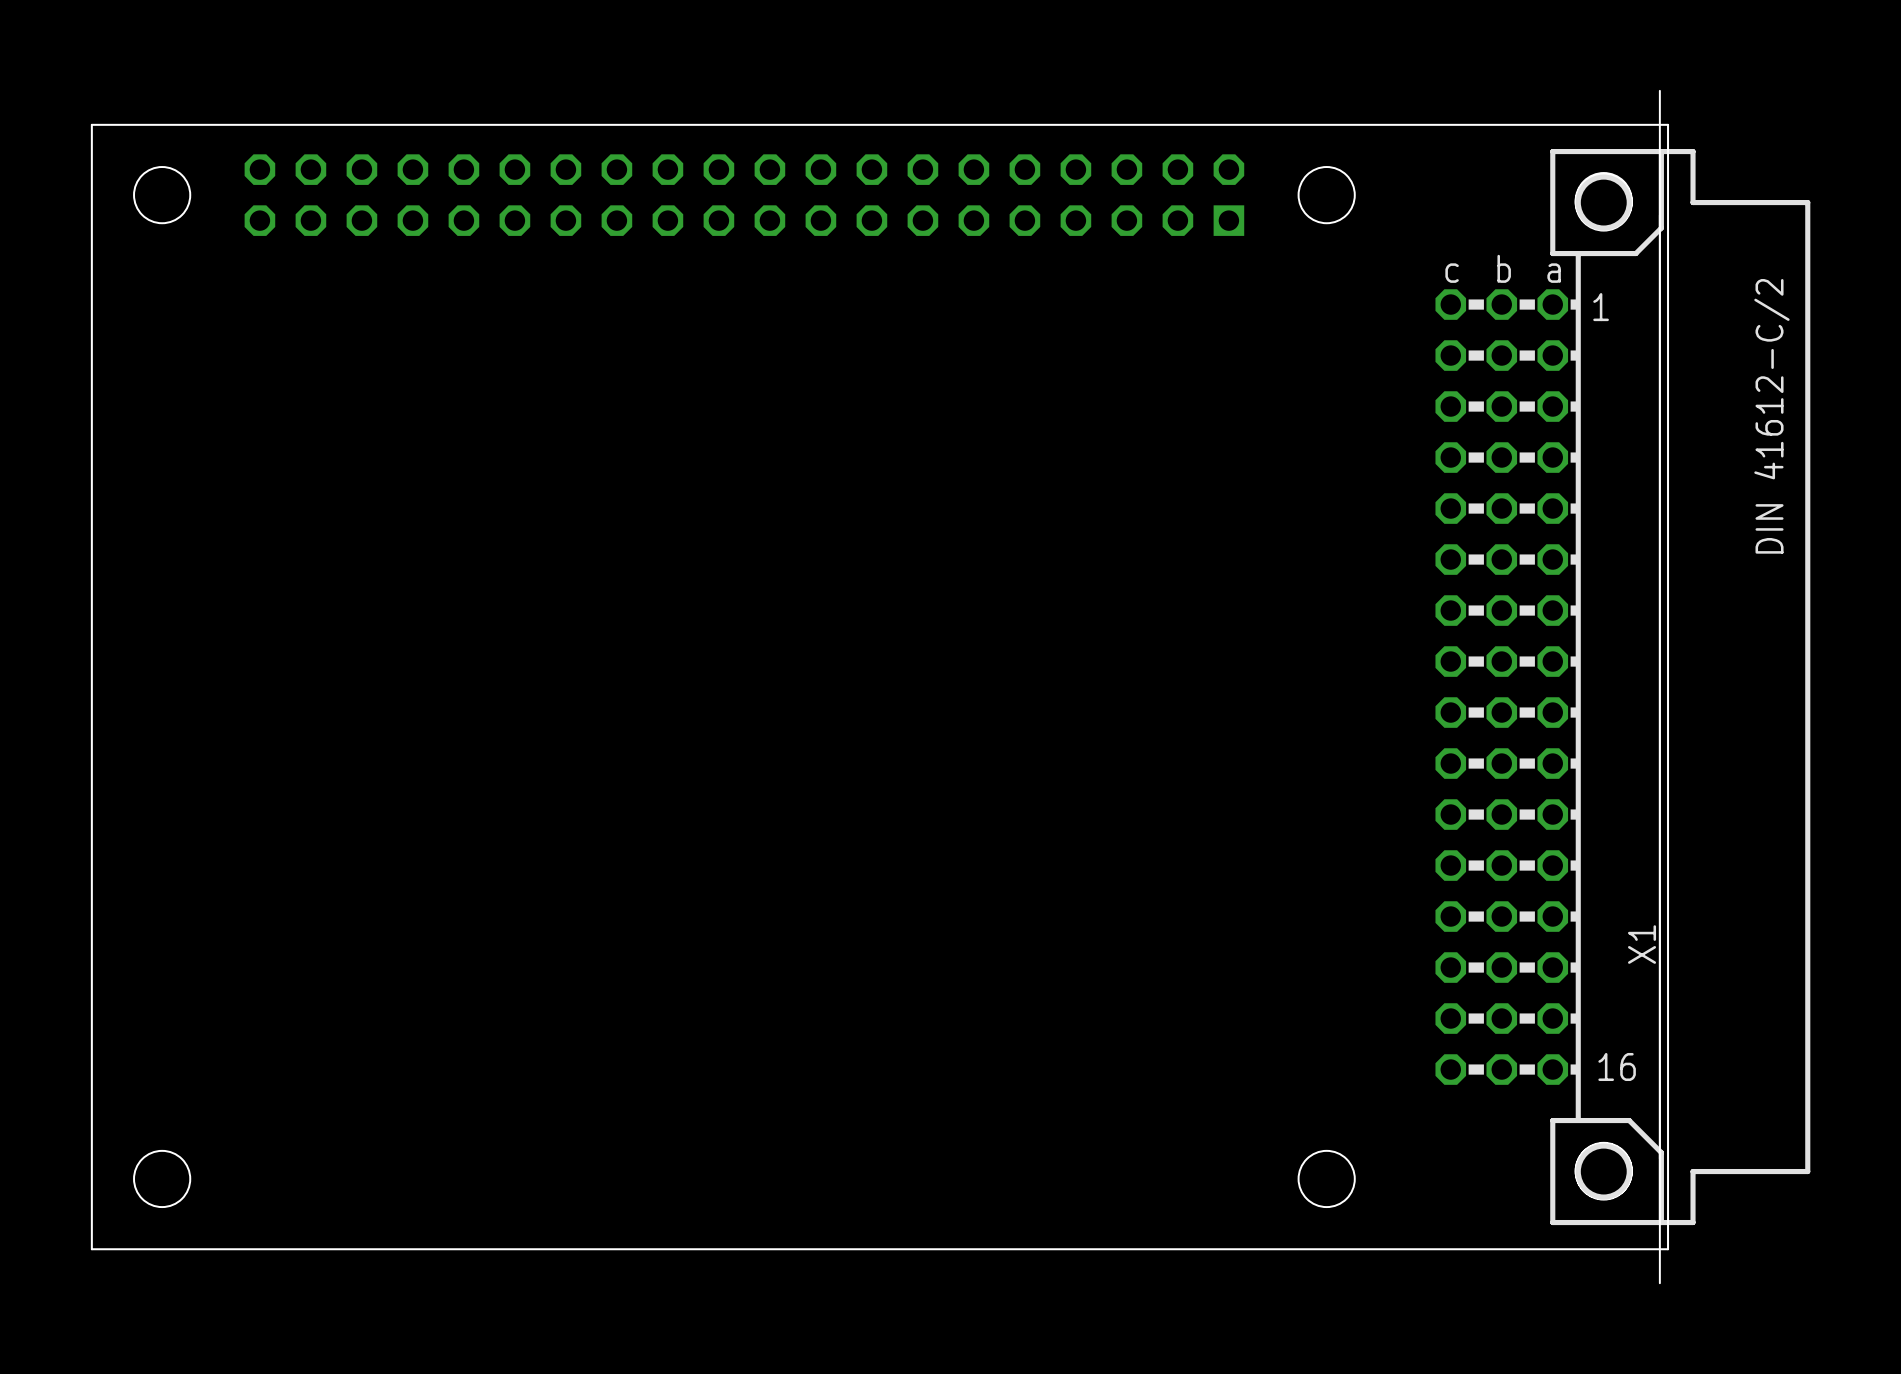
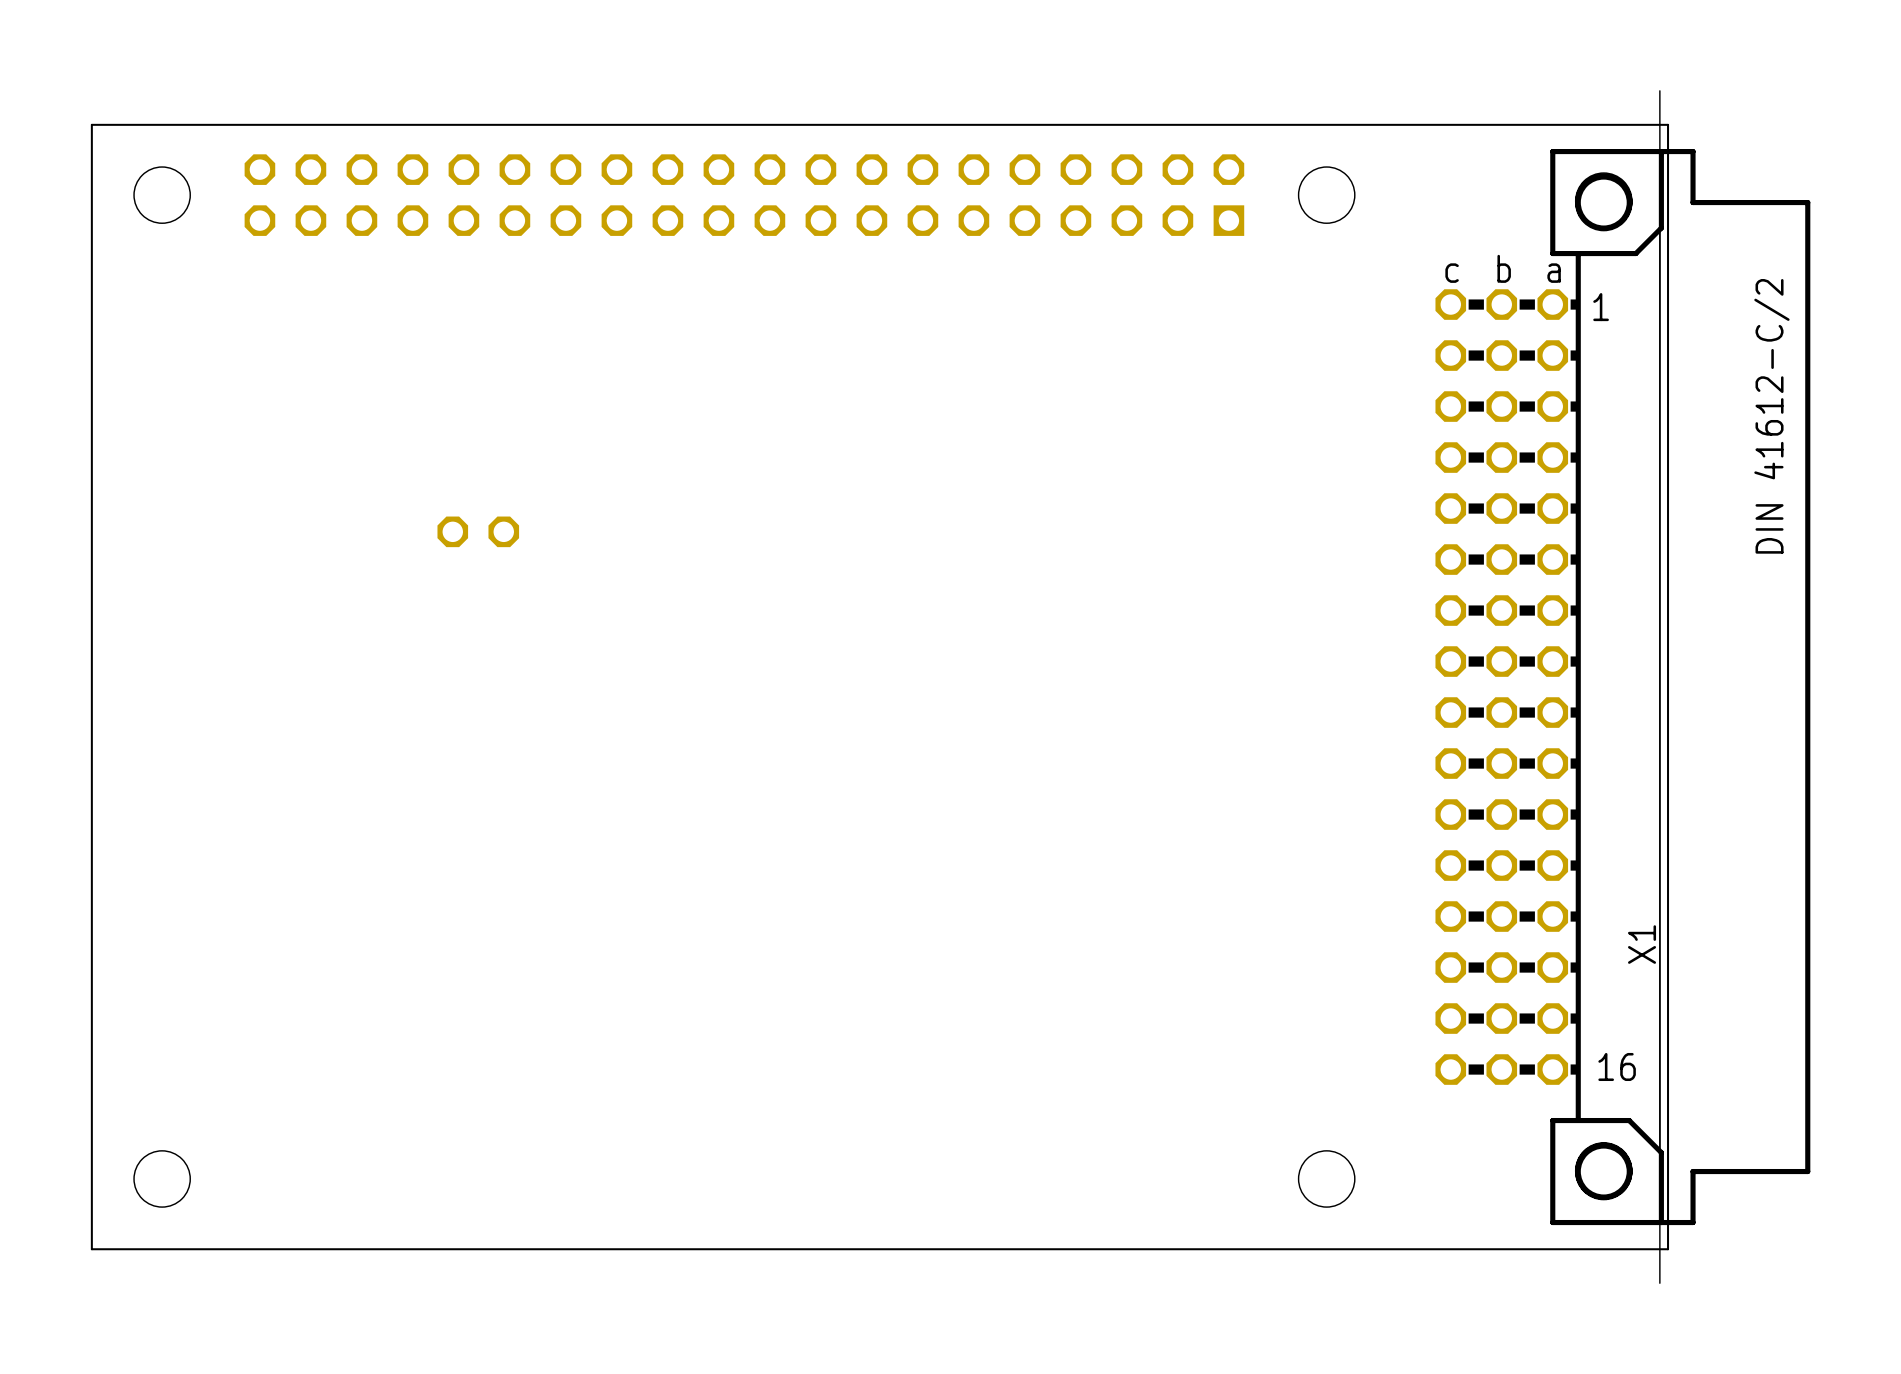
part: none -> (478, 531)

